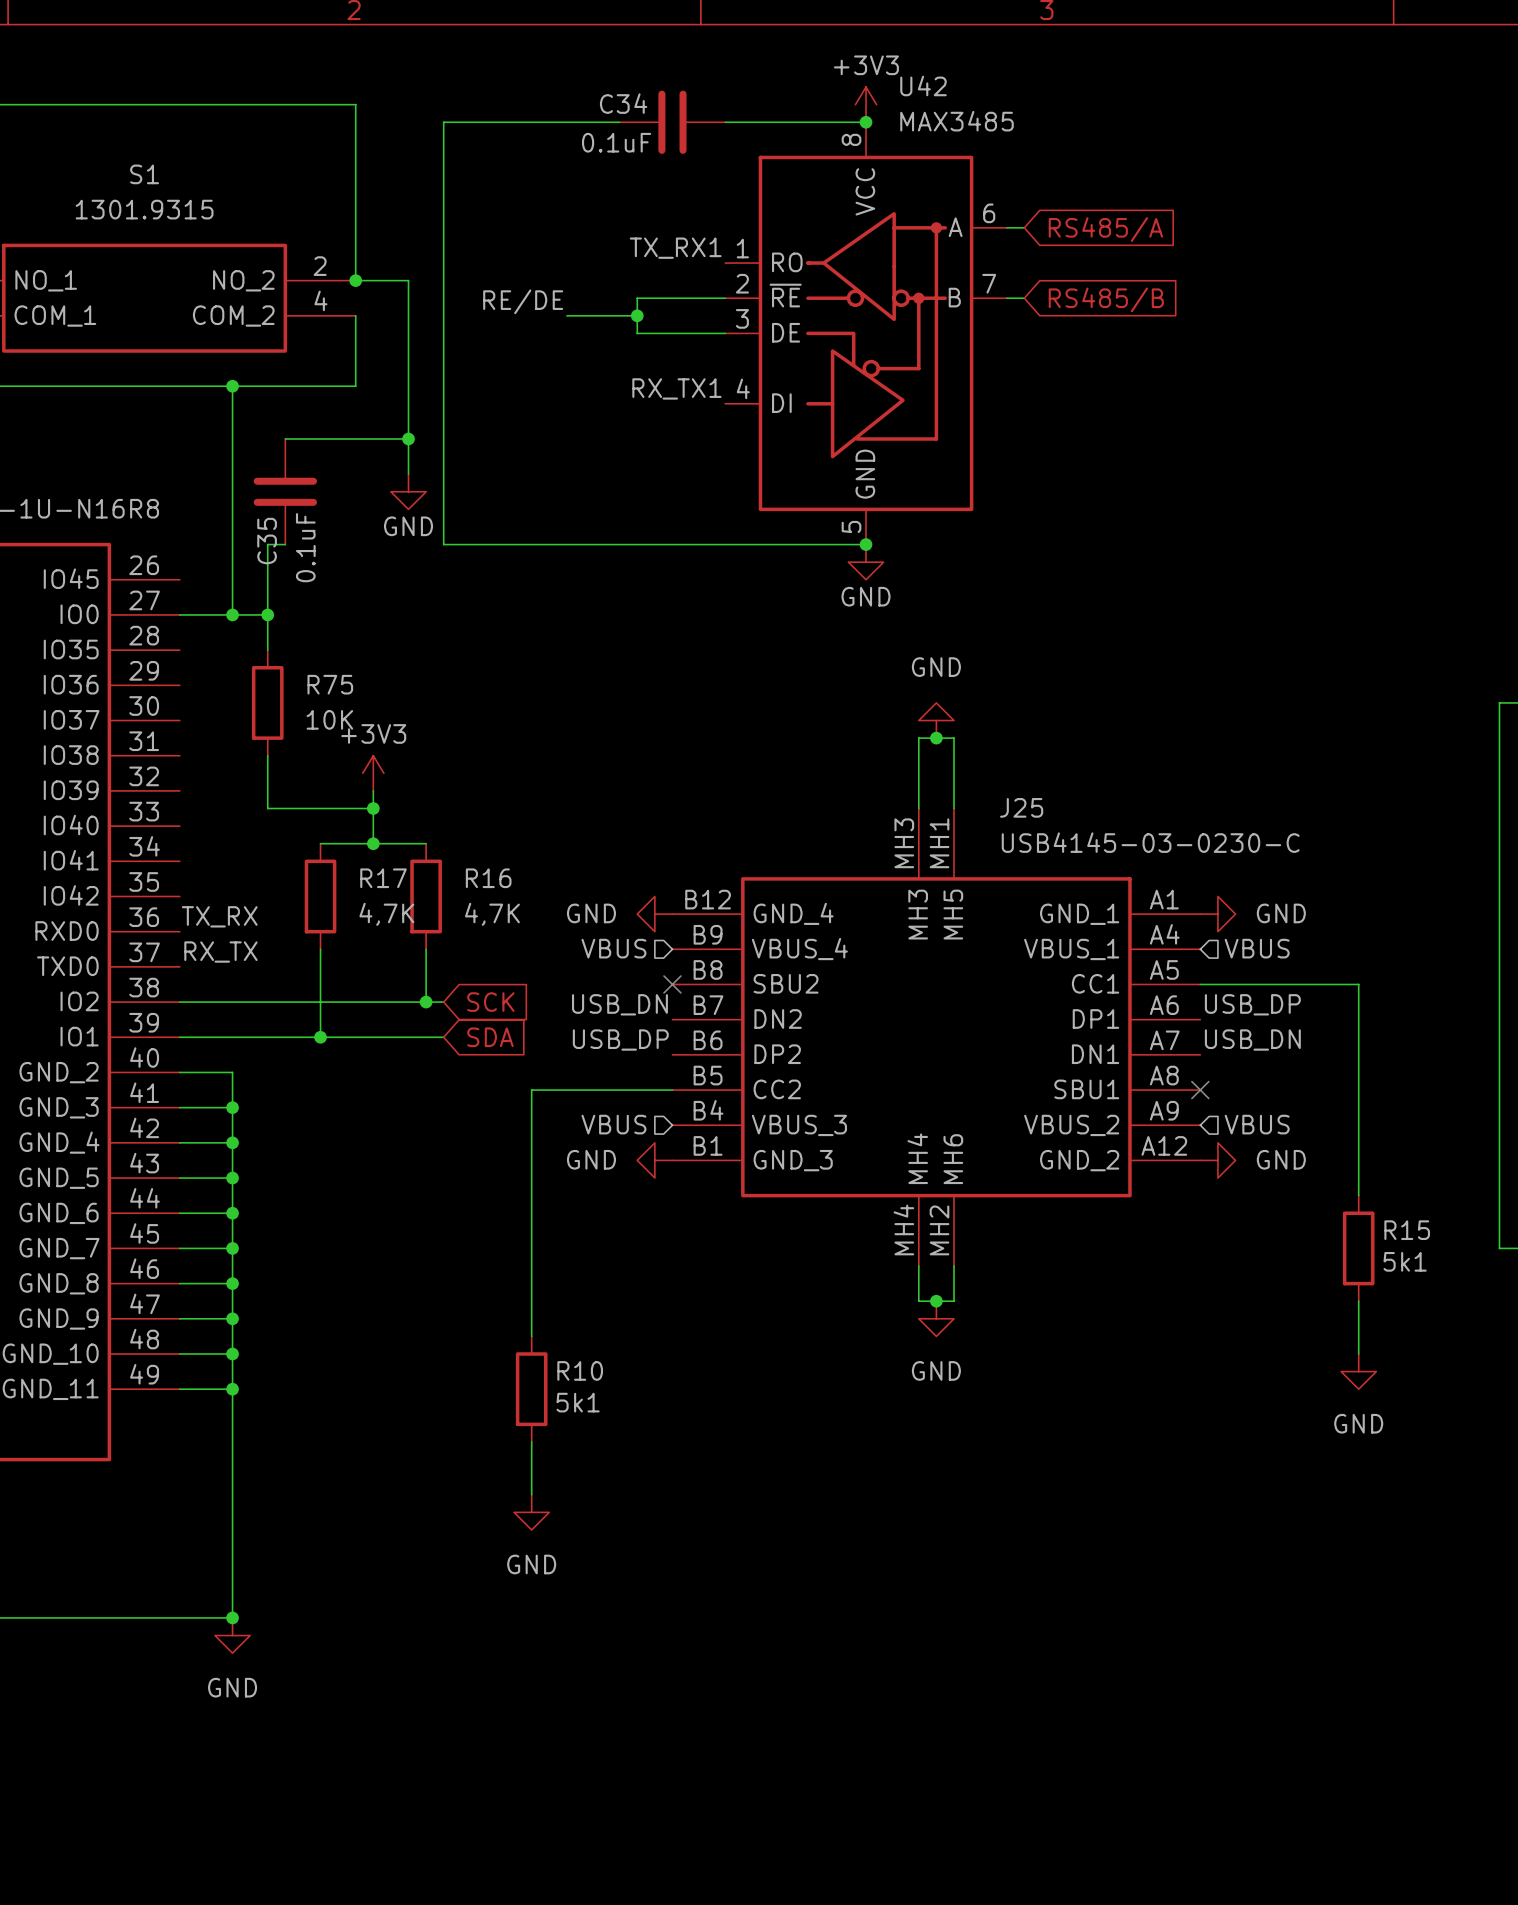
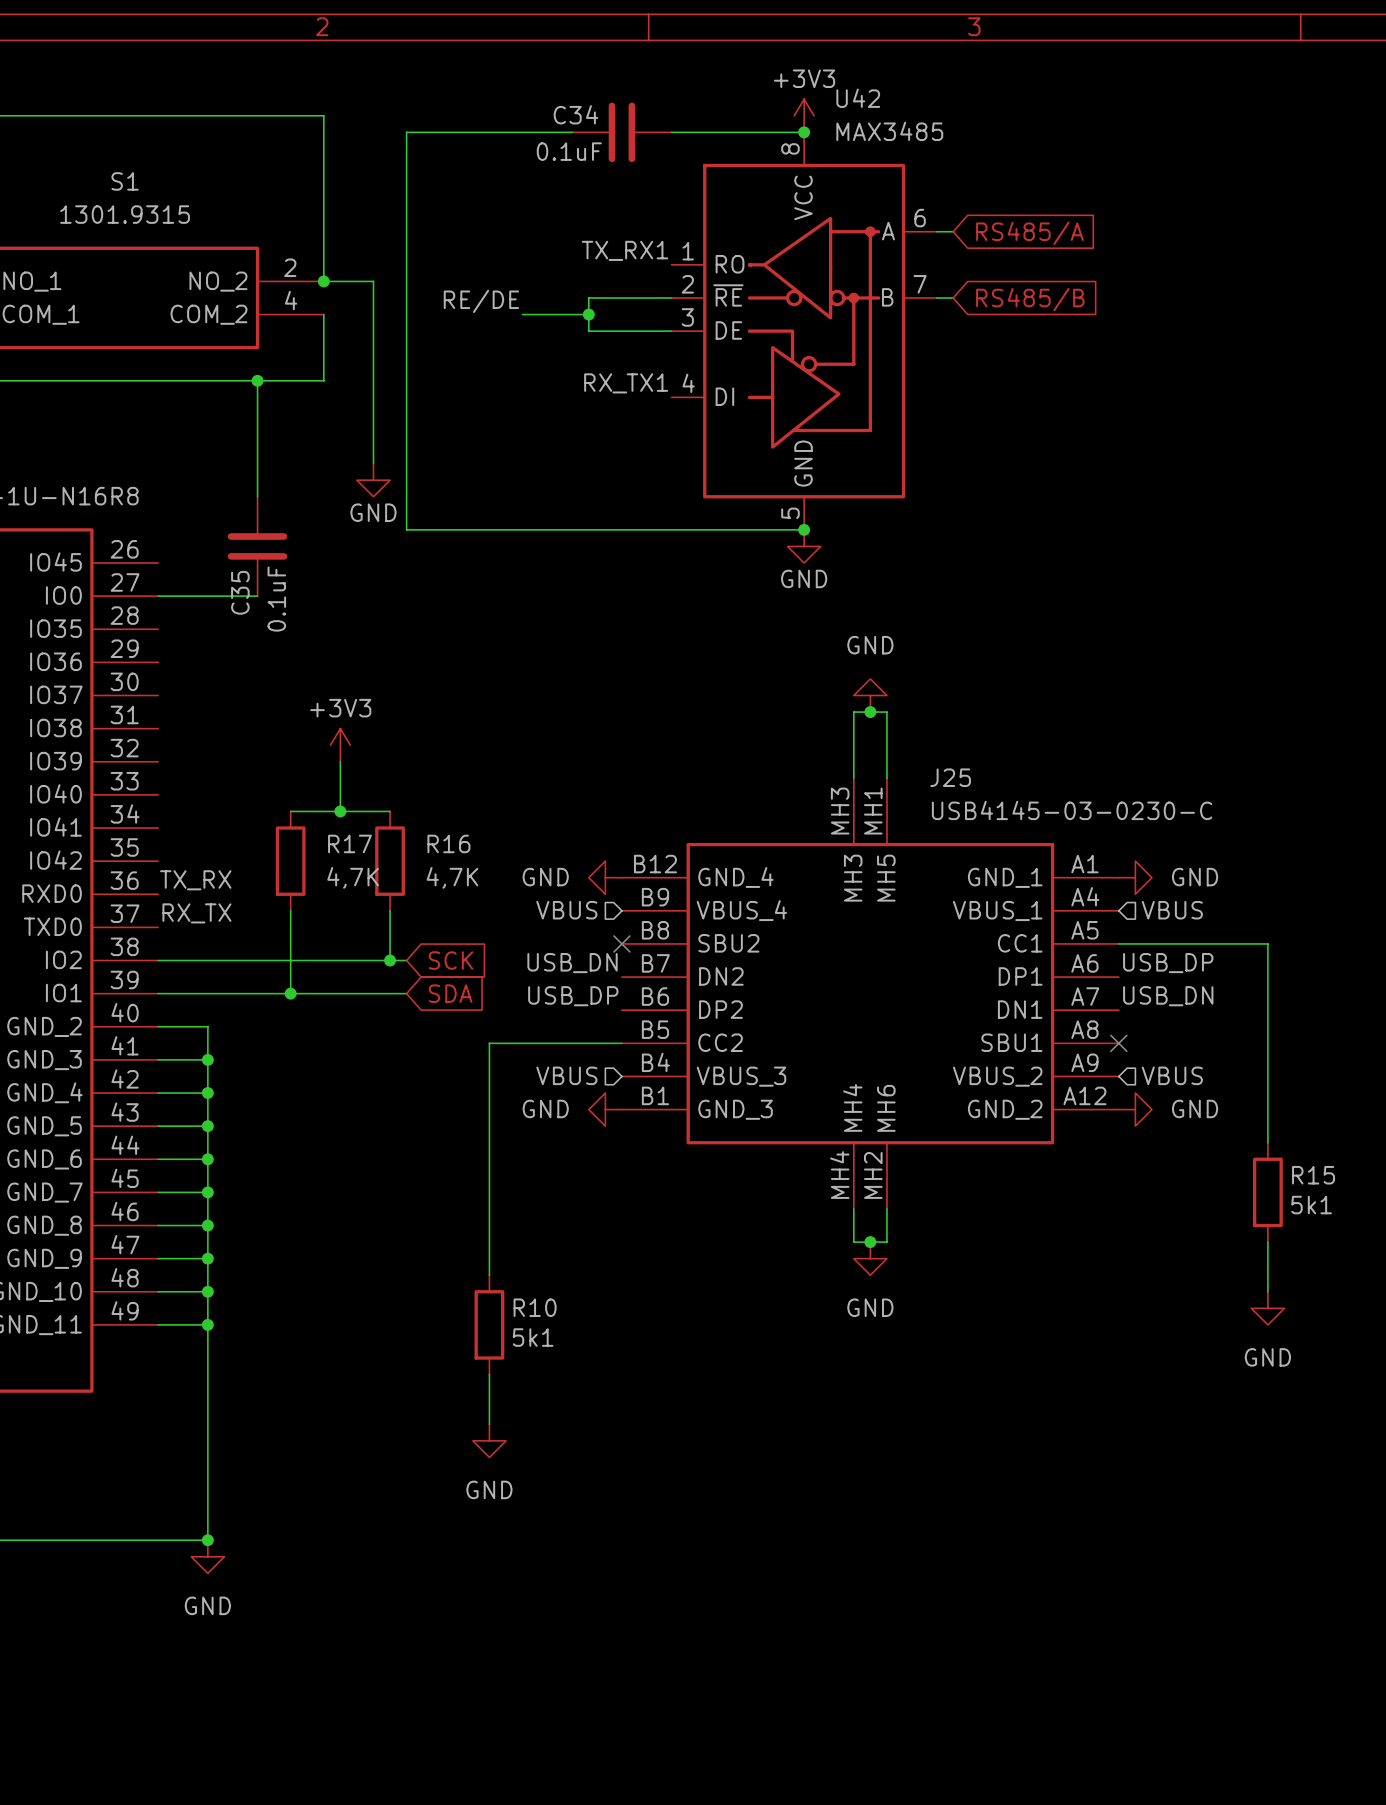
wire: (232, 386) (232, 614) -> none
junction position: (232, 386) -> (257, 380)
wire: none -> (257, 380) (257, 496)
wire: (285, 439) (408, 439) -> none
junction: (408, 439) -> none
C35 position: (285, 491) -> (257, 546)
wire: (285, 544) (267, 544) (267, 650) -> none
junction: (232, 614) -> none
wire: none -> (240, 596) (257, 596)
junction: (267, 614) -> none
R75: 10K (267, 702) -> none
wire: (267, 755) (267, 808) (373, 808) -> none
junction: (373, 808) -> none

